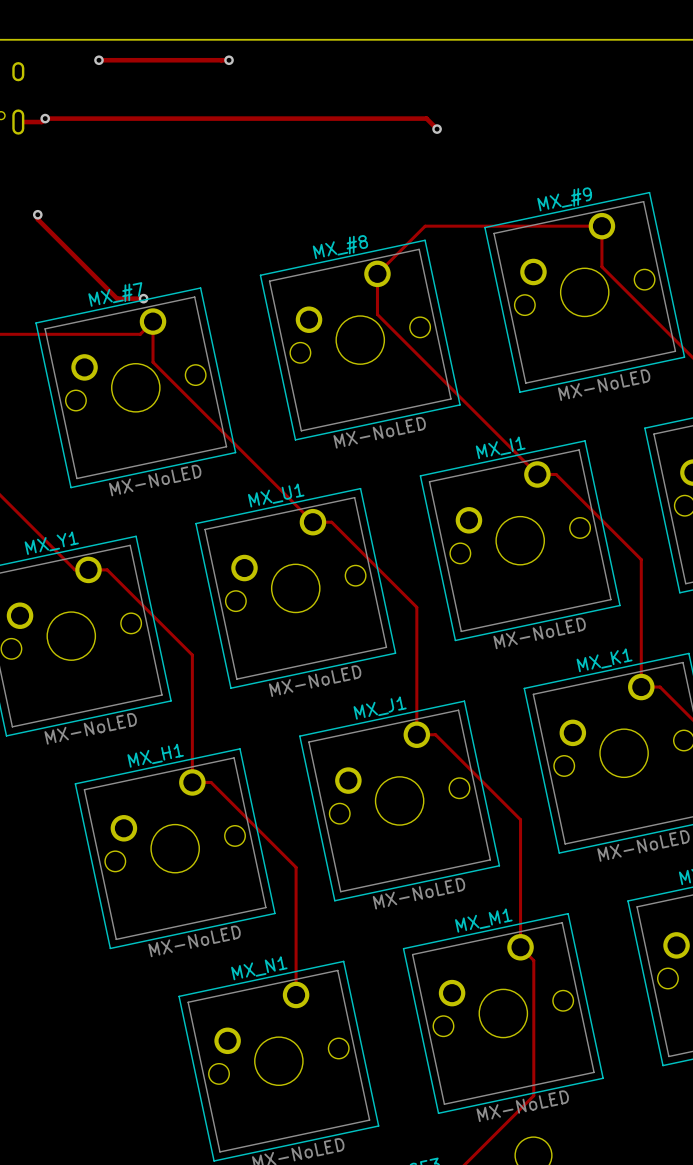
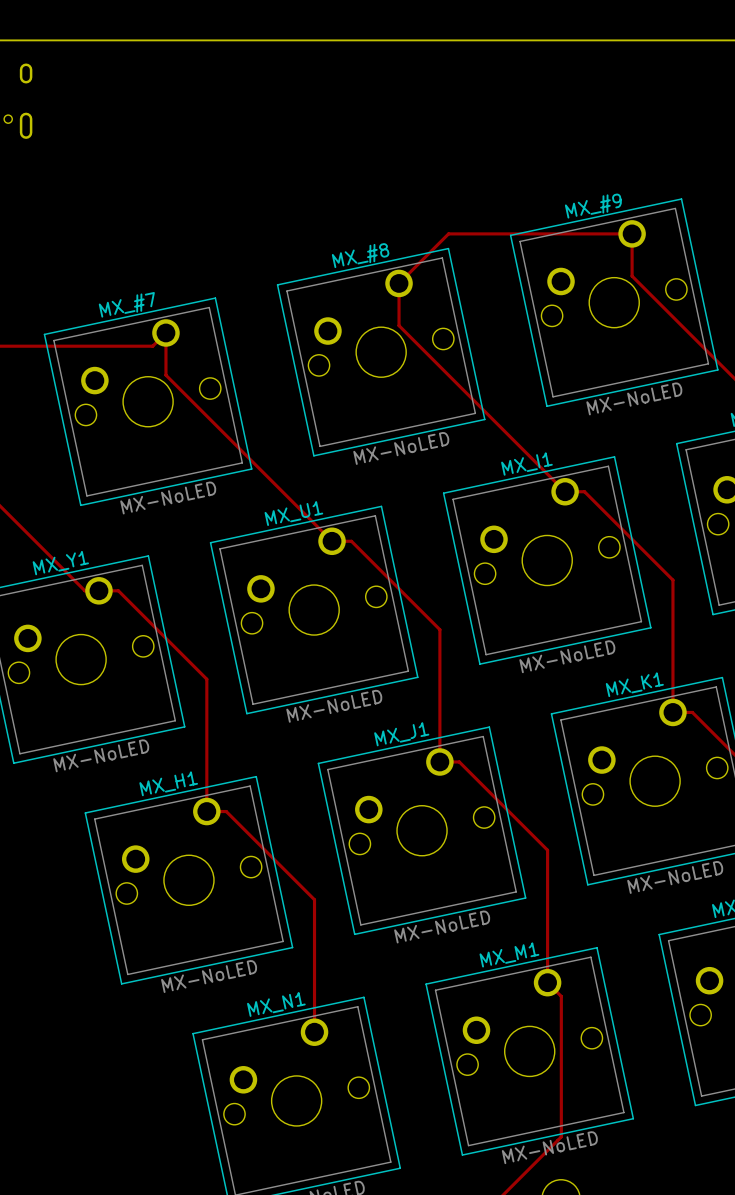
track: (98, 60) (229, 60) -> none
via: (98, 60) -> none
via: (229, 60) -> none
via: (45, 118) -> none
track: (18, 122) (41, 122) (45, 118) (426, 118) (437, 129) -> none
via: (437, 129) -> none
track: (37, 214) (37, 219) (117, 298) (143, 298) -> none
via: (37, 214) -> none
via: (143, 298) -> none

